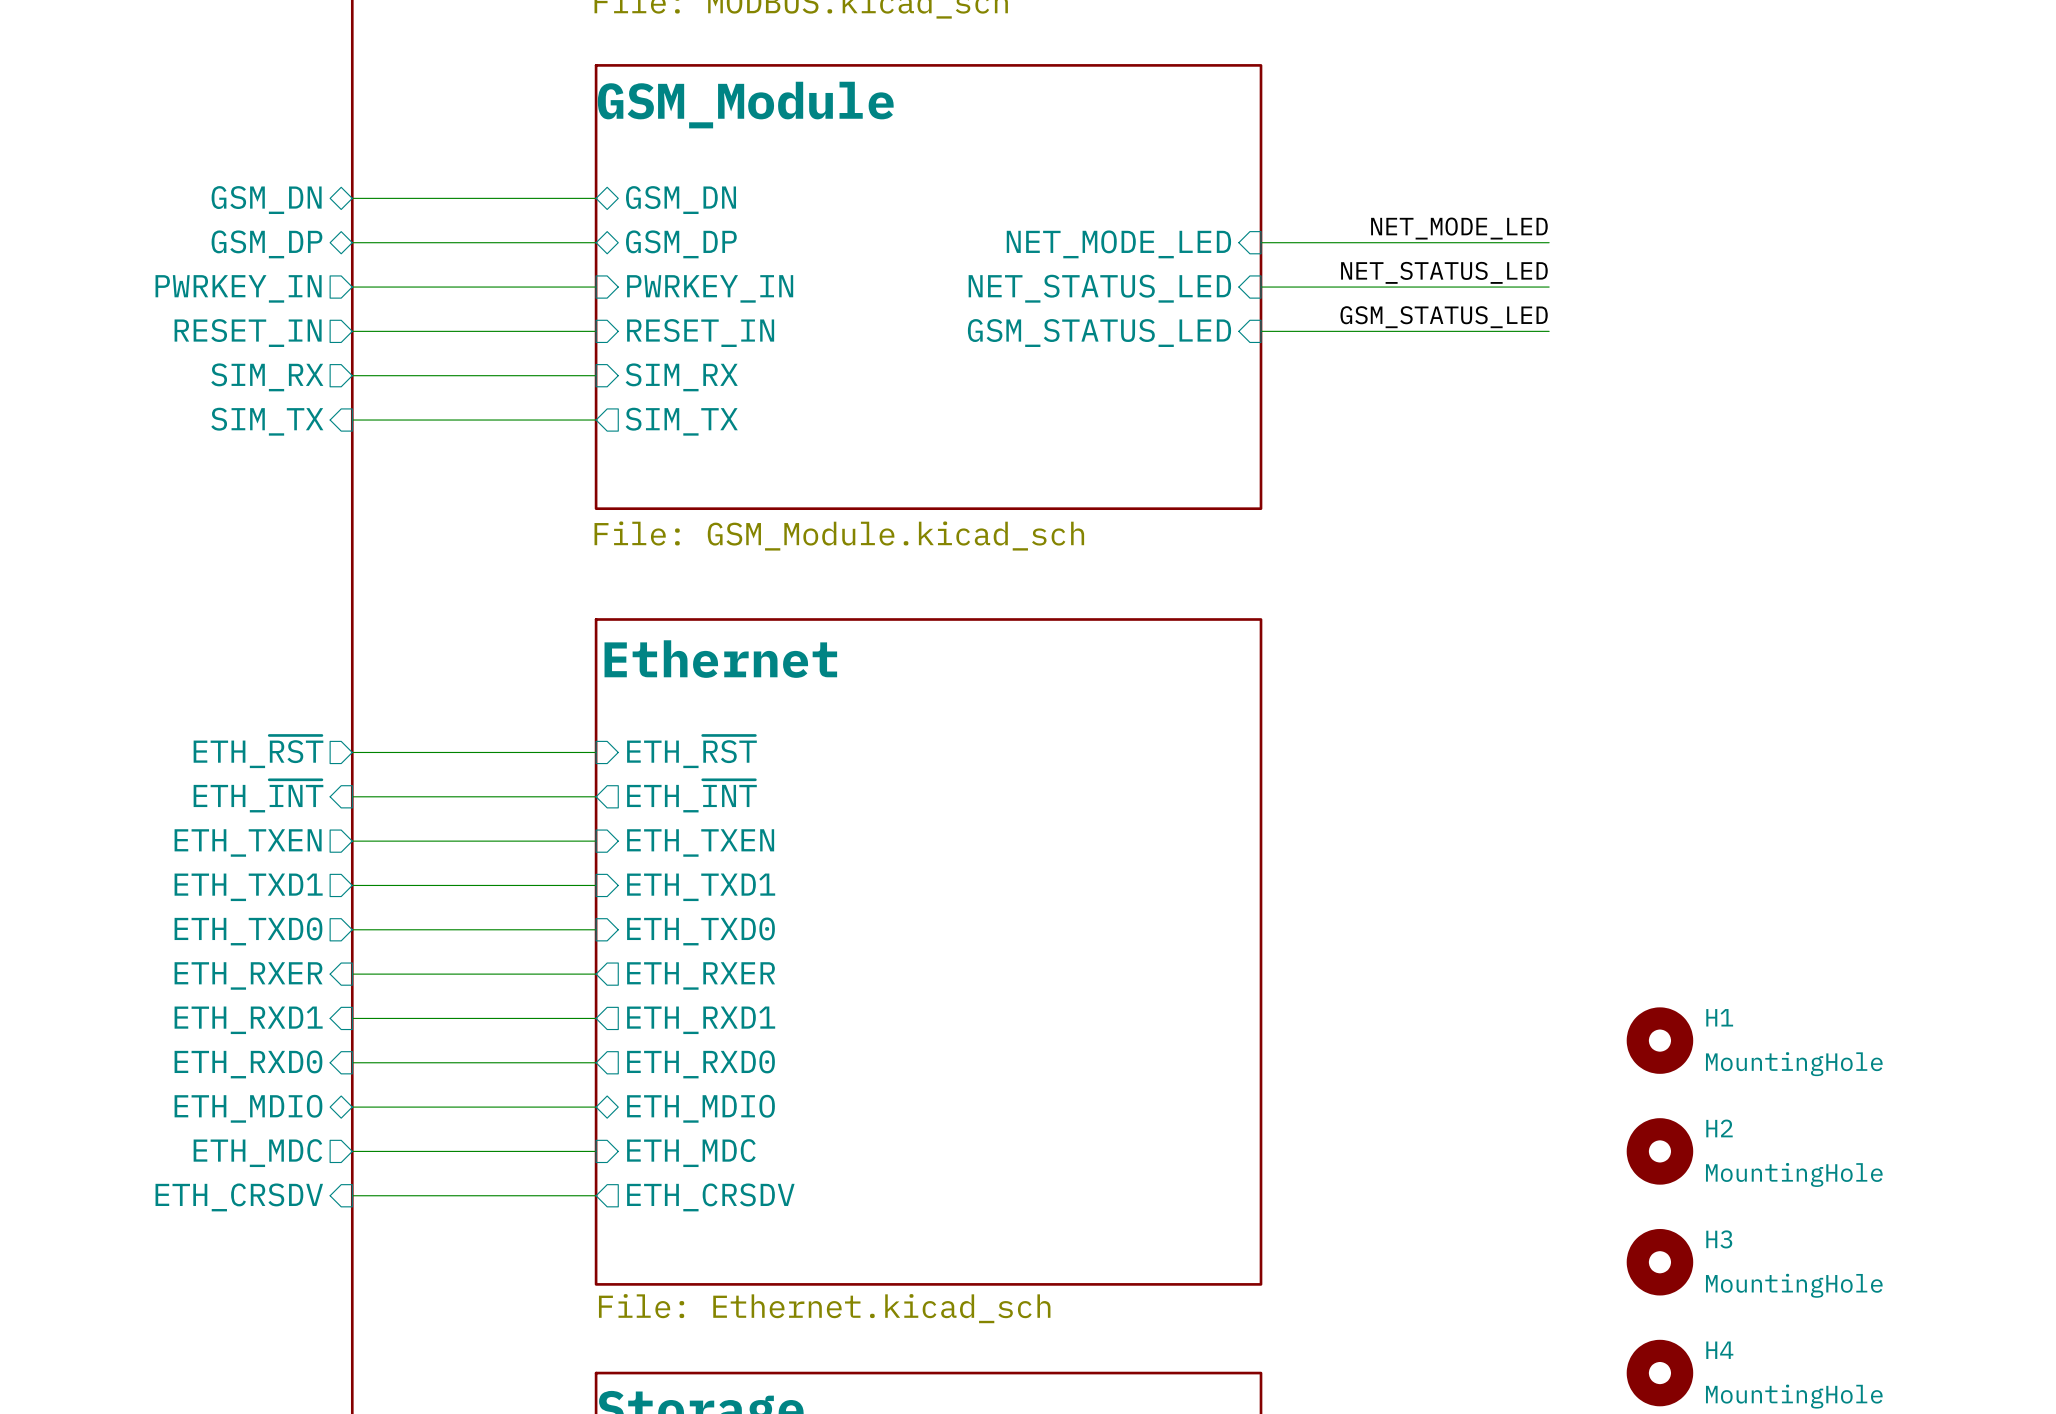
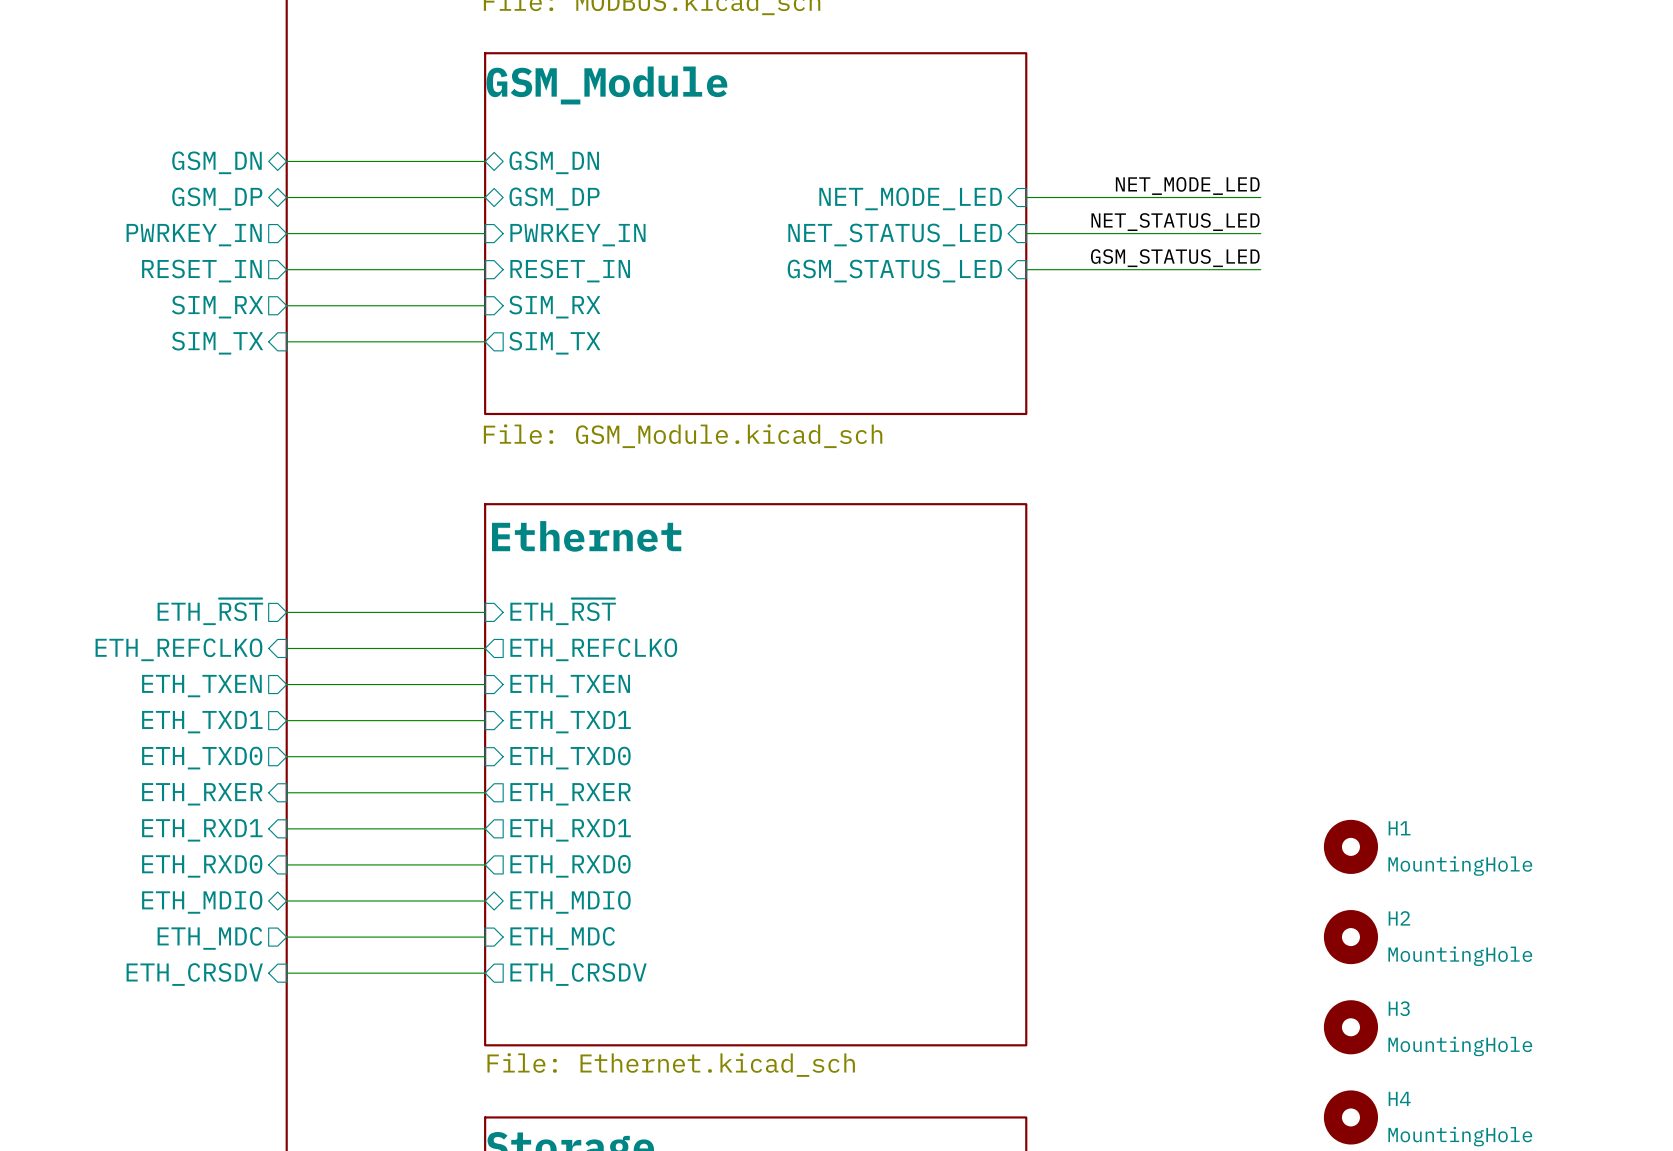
sheet pin: ETH_~{INT} (258, 796) -> ETH_REFCLKO (178, 649)
sheet pin: ETH_~{INT} (691, 796) -> ETH_REFCLKO (593, 649)

